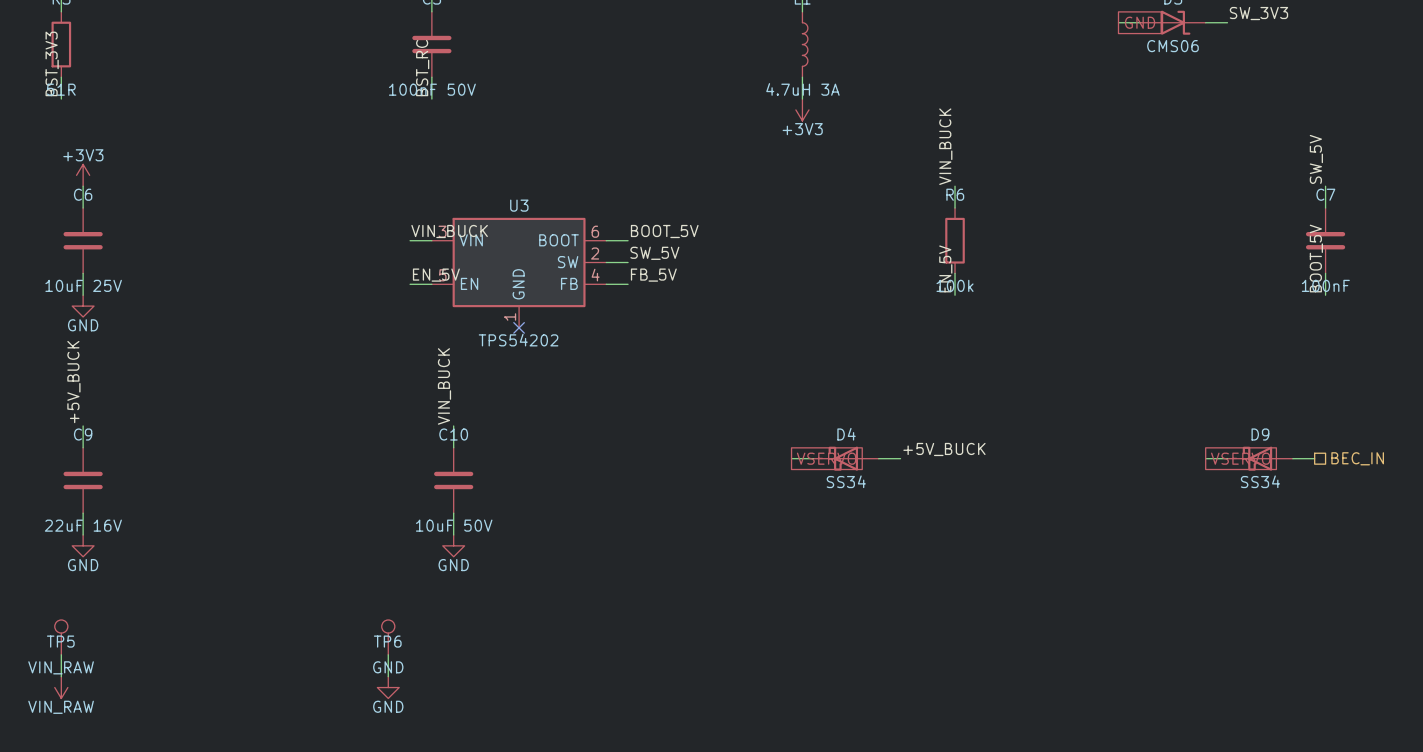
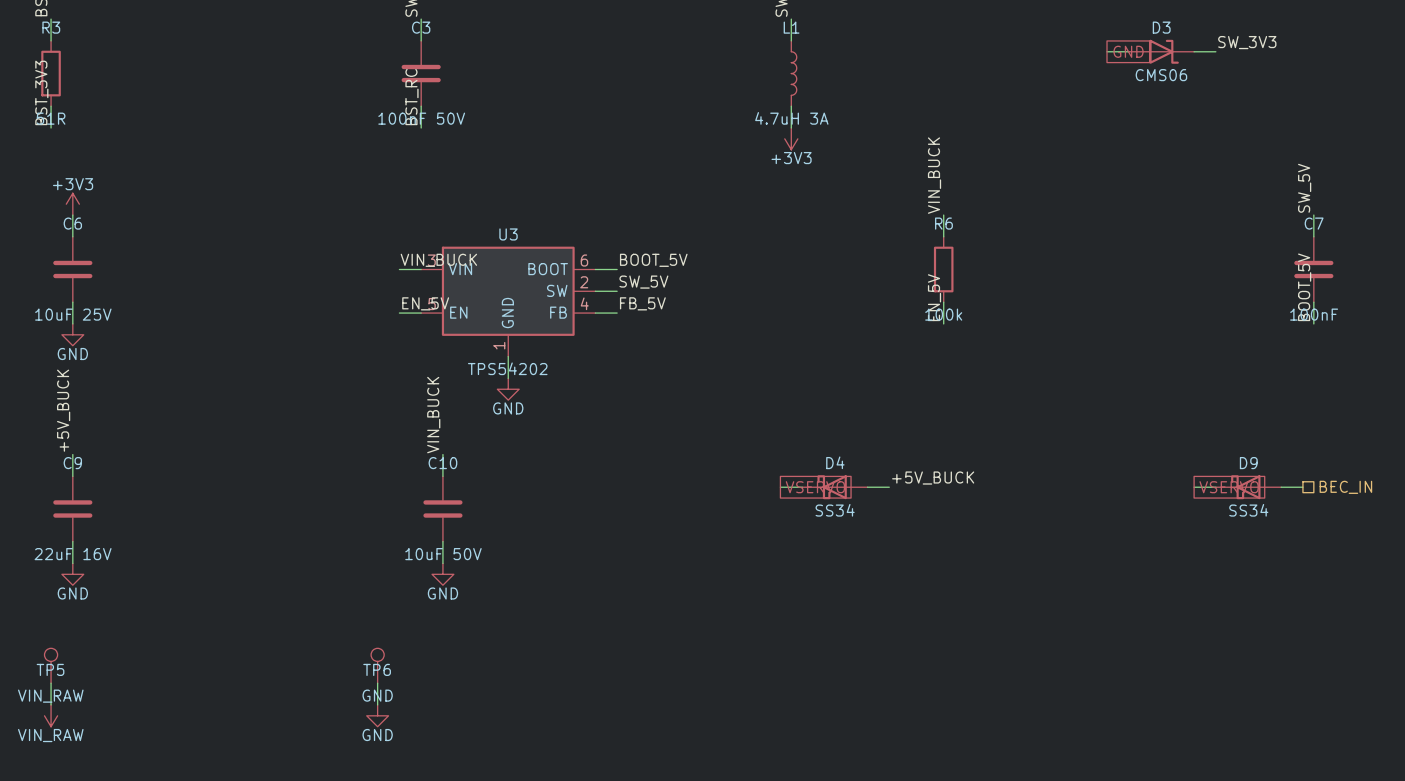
wire: none -> (508, 356) (508, 378)
no-connect mark: (519, 327) -> none
power symbol: none -> GND (508, 389)

